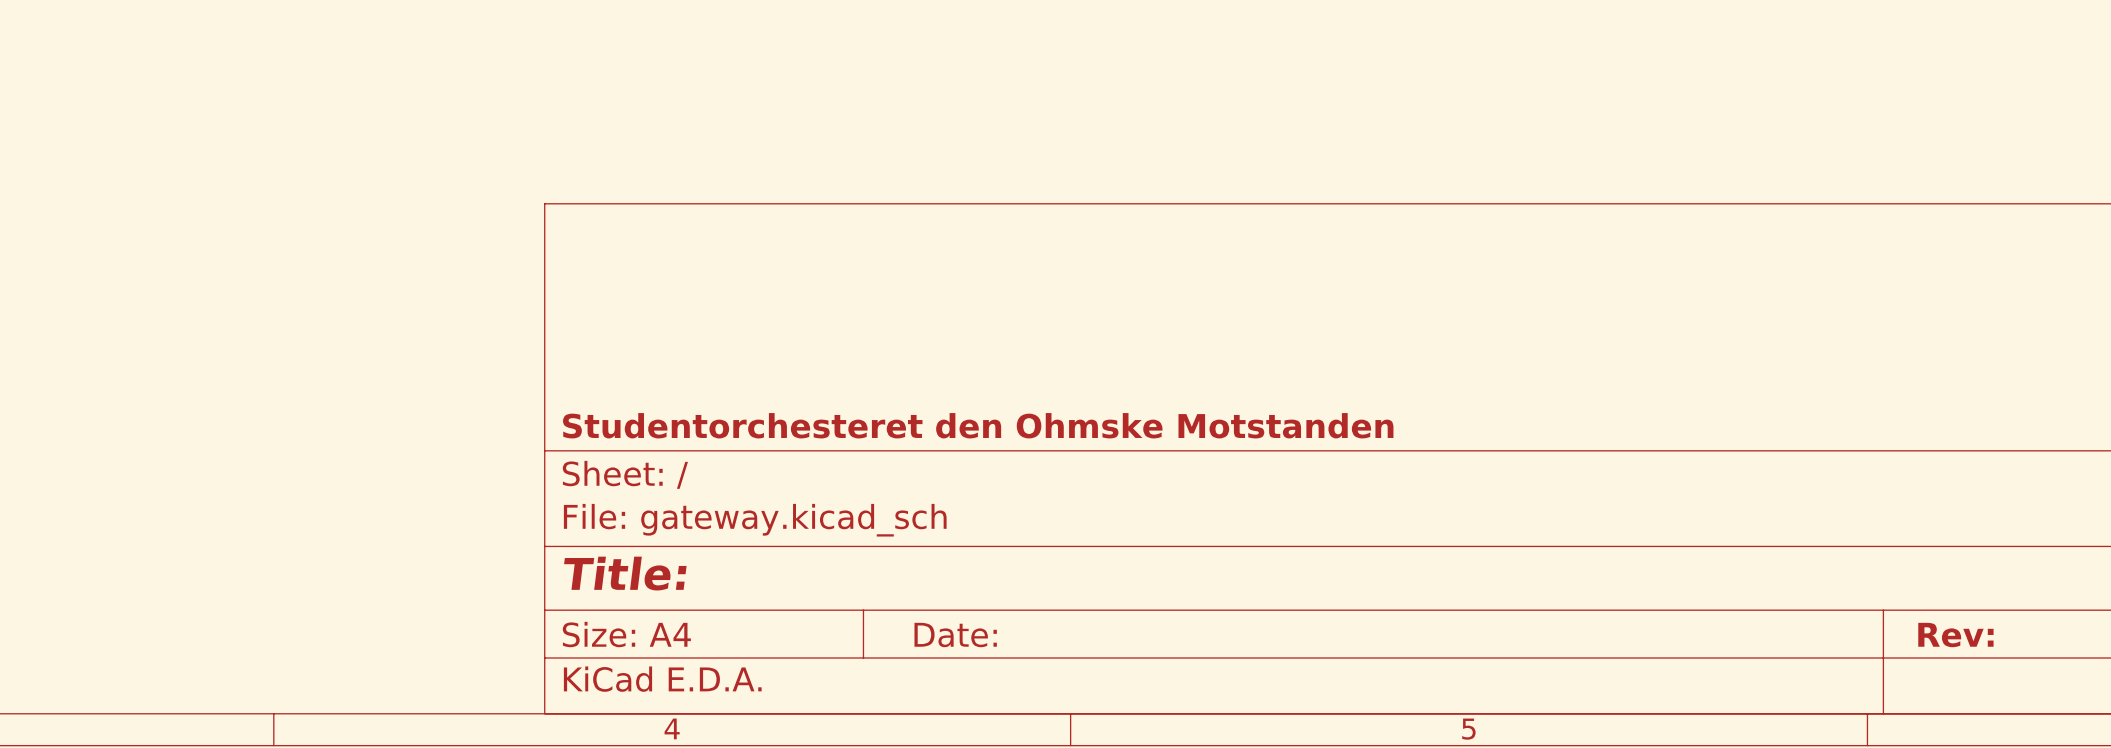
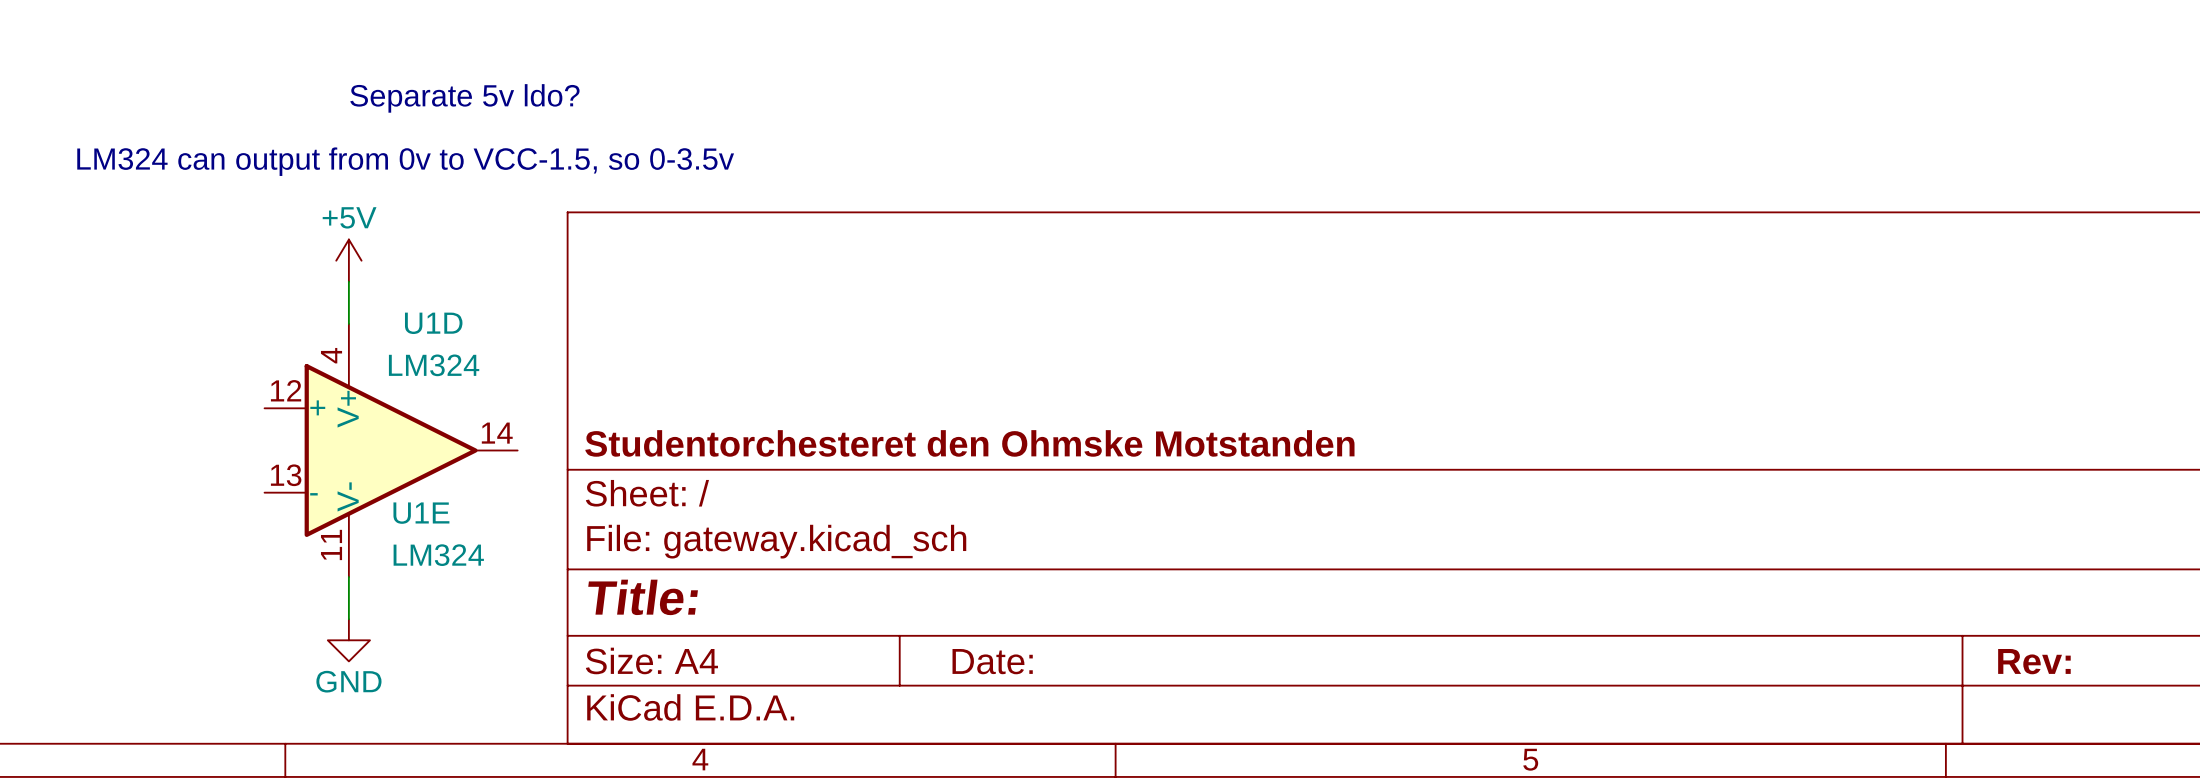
text: none -> Separate 5v ldo? (464, 98)
text: none -> LM324 can output from 0v to VCC-1.5, so 0-3.5v (405, 161)
power symbol: none -> +5V (348, 260)
wire: none -> (348, 281) (348, 323)
U1E: none -> LM324 (348, 450)
U1D: none -> LM324 (391, 450)
wire: none -> (348, 577) (348, 619)
power symbol: none -> GND (348, 640)

